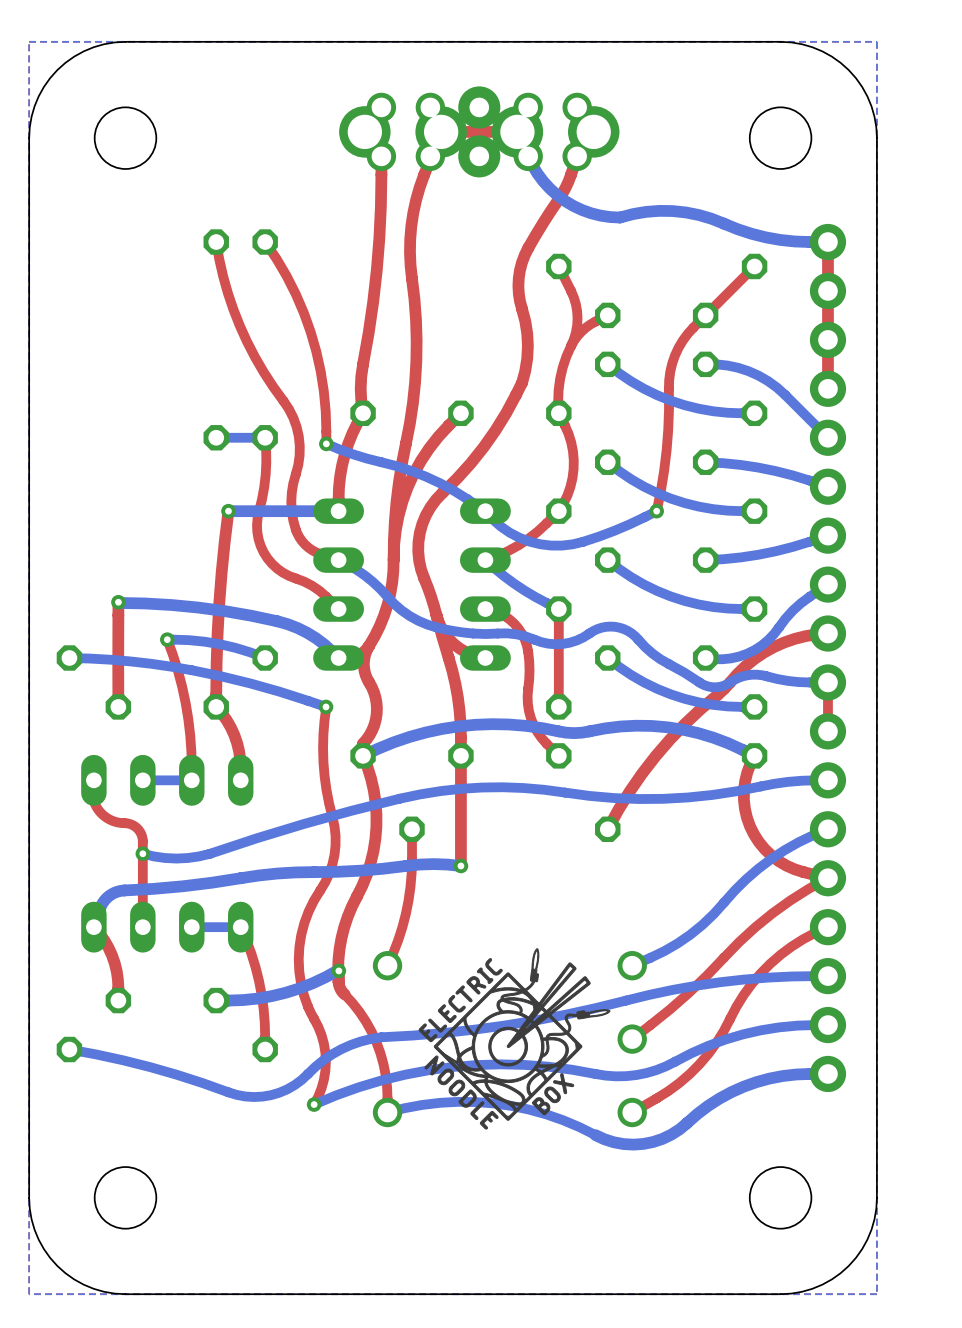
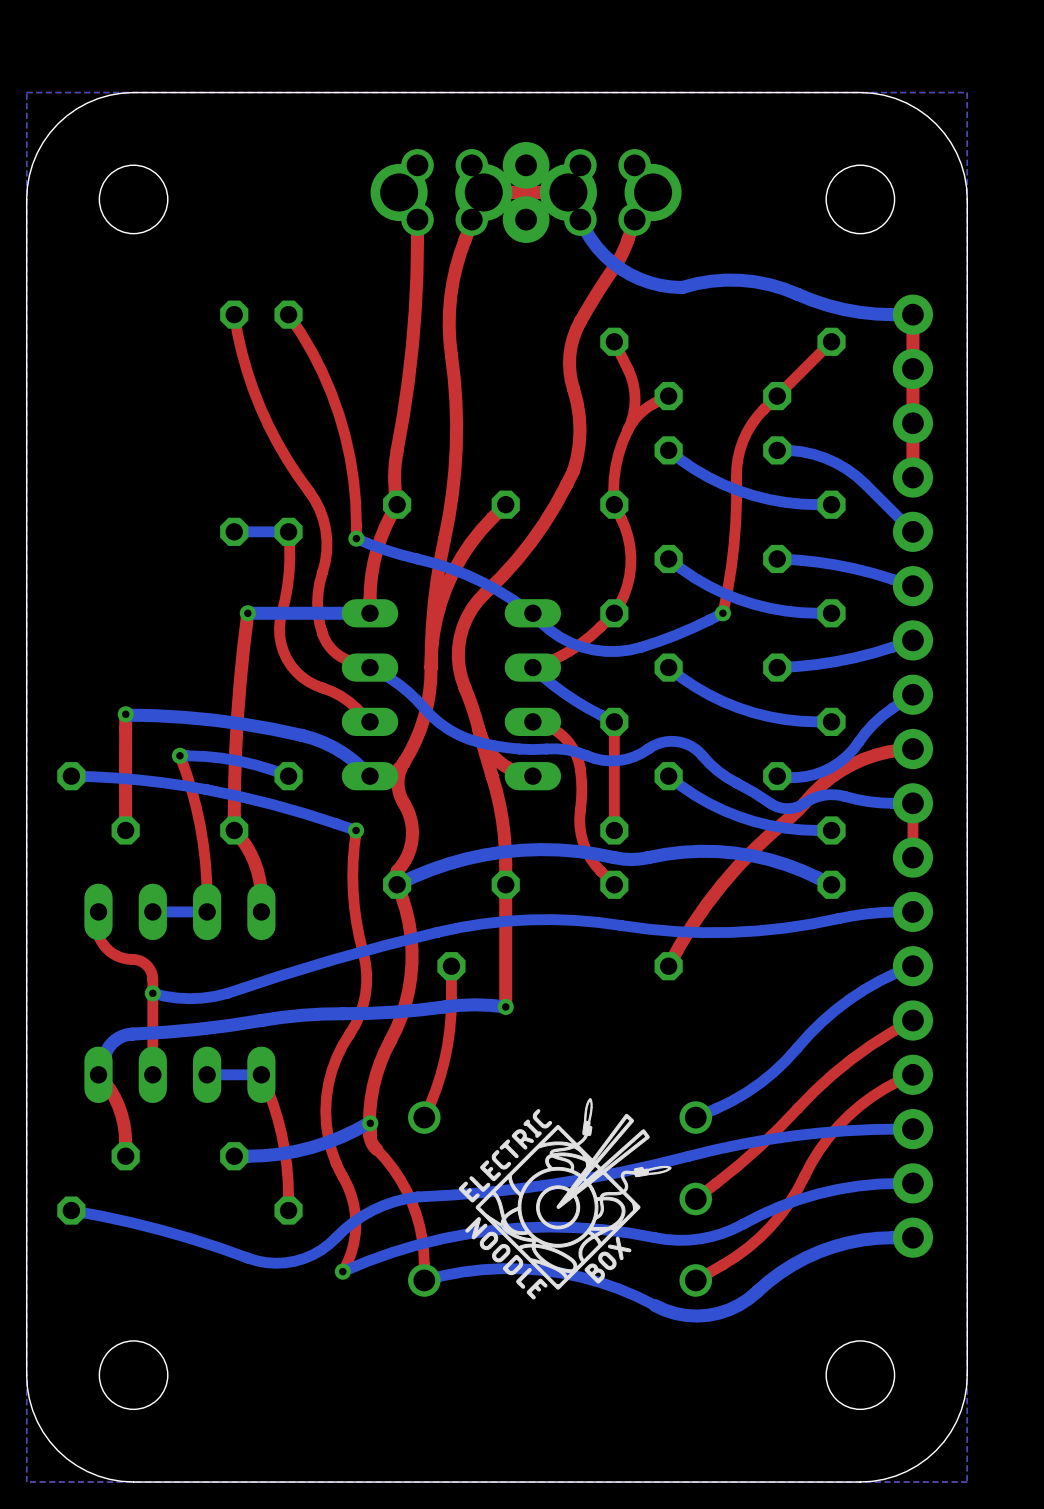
top track: (754, 755) (745, 781) (743, 799) (746, 817) (754, 834) (771, 855) (786, 865) (827, 878) -> none

